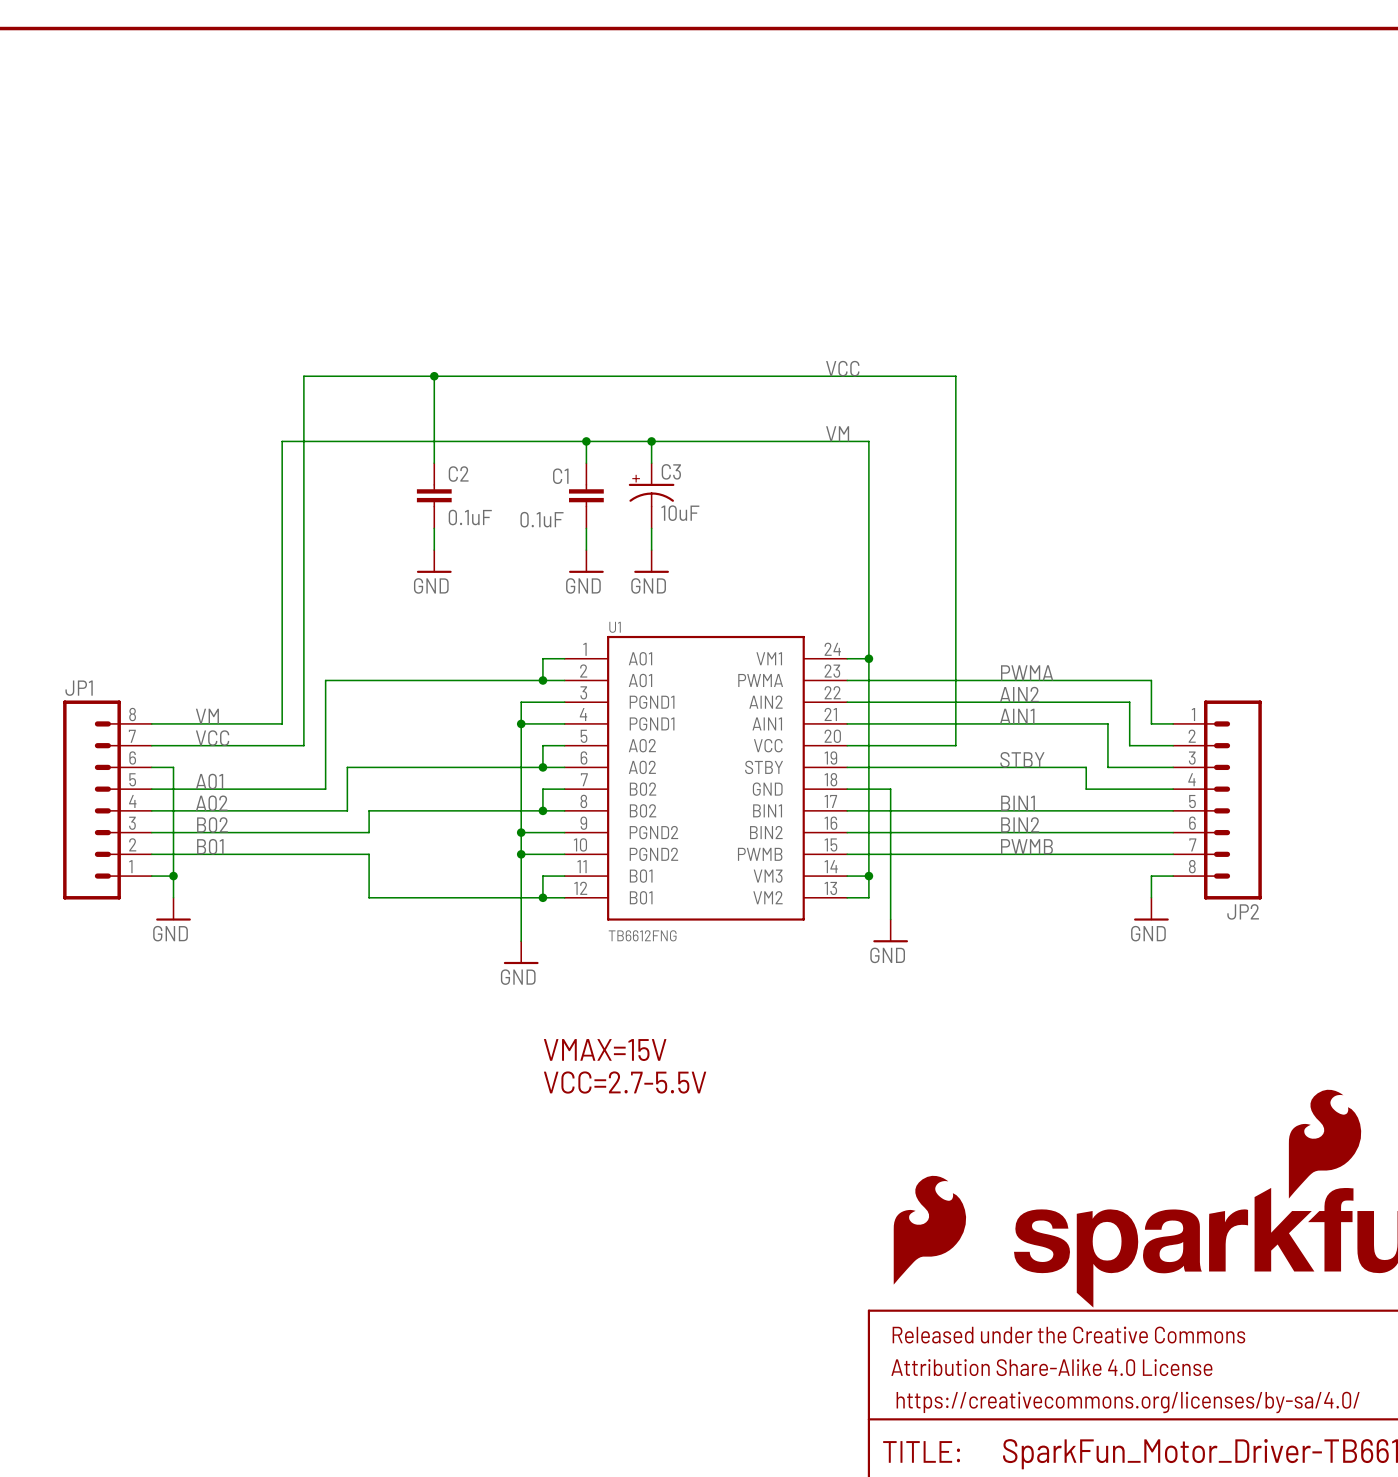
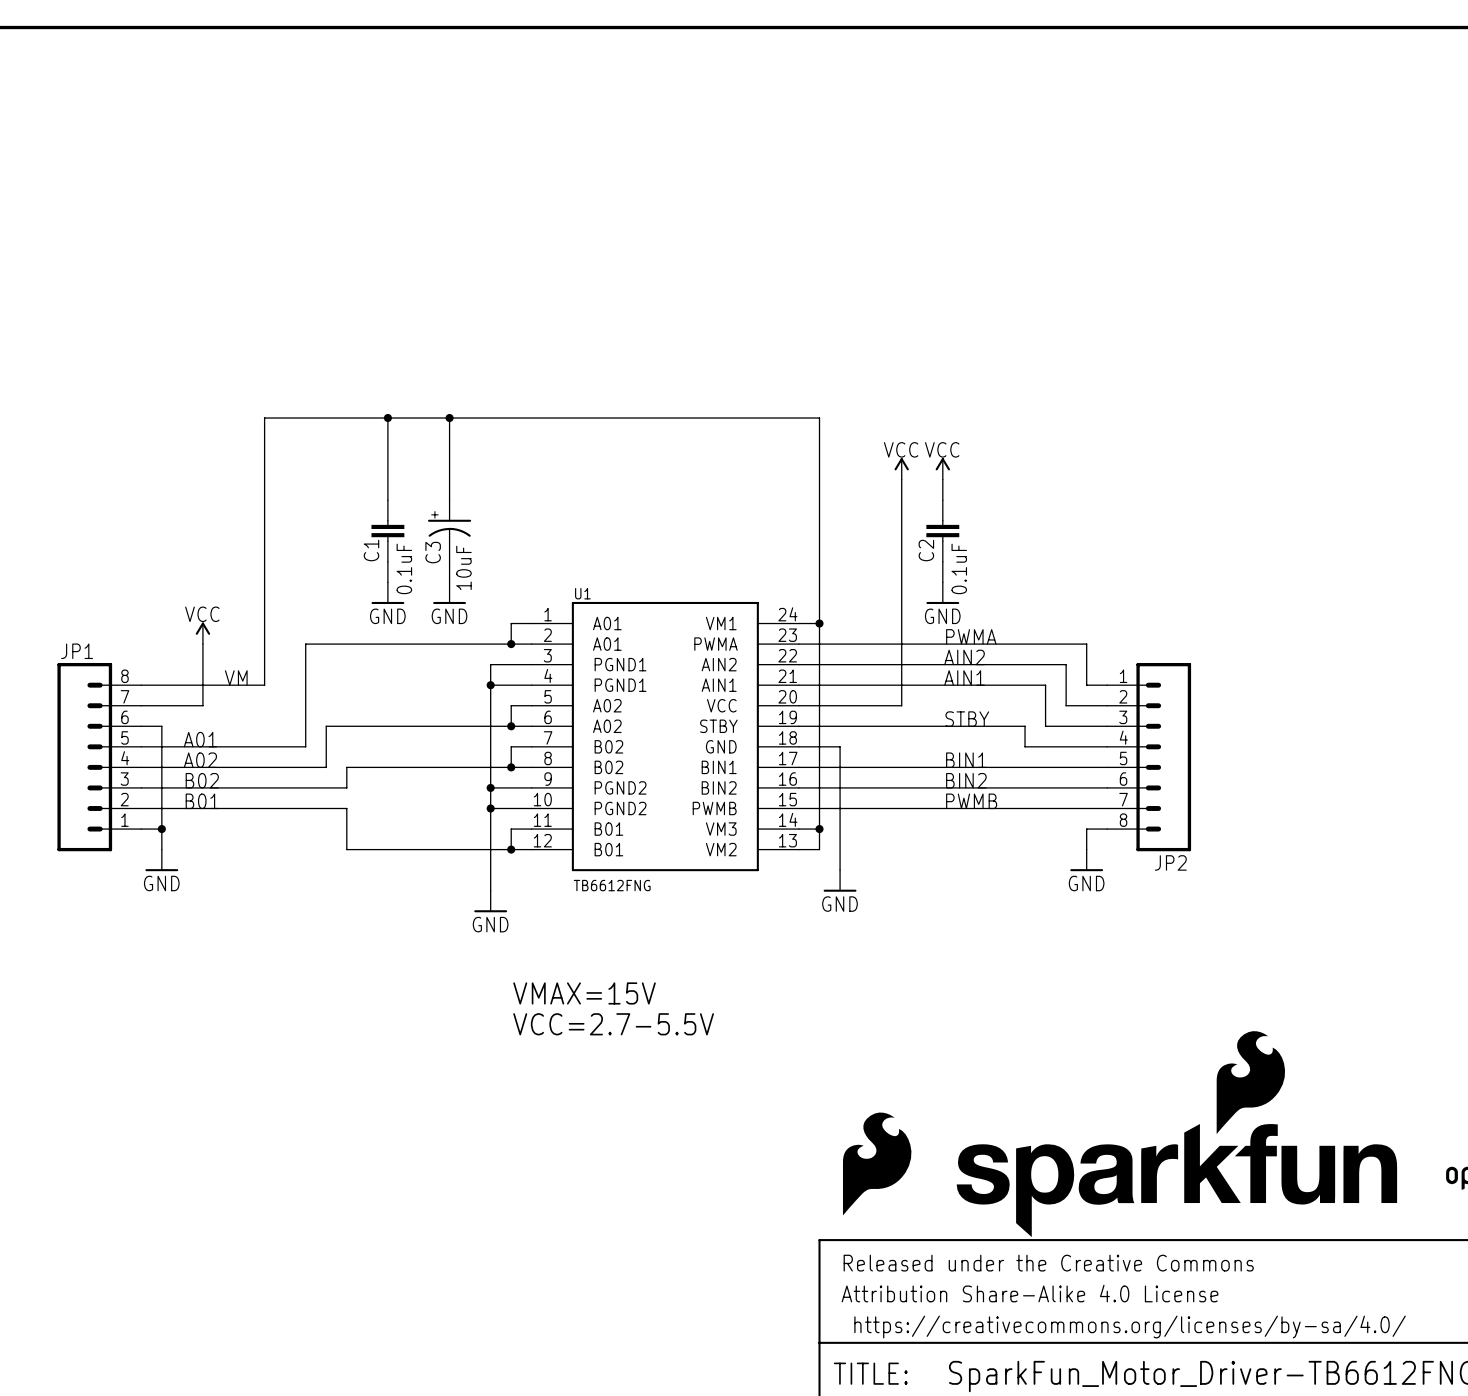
label: VCC (842, 368) -> none
wire: (434, 376) (434, 463) -> (387, 418) (387, 500)
junction: (434, 376) -> none
label: VM (837, 433) -> none
junction: none -> (387, 418)
wire: none -> (449, 418) (449, 500)
junction: none -> (449, 418)
wire: (586, 441) (586, 463) -> none
junction: (586, 441) -> none
wire: (651, 441) (651, 463) -> none
junction: (651, 441) -> none
C3 name rotation: 0° (671, 471) -> 90° counterclockwise (433, 552)
C3 name position: C3 (671, 471) -> C3 (433, 552)
C2 name rotation: 0° (458, 474) -> 90° counterclockwise (926, 550)
C2 name position: C2 (458, 474) -> C2 (926, 550)
C1 name rotation: 0° (560, 476) -> 90° counterclockwise (371, 550)
C1 name position: C1 (560, 476) -> C1 (371, 550)
C2 position: (434, 495) -> (942, 531)
C1 position: (586, 495) -> (387, 531)
C3 position: (651, 495) -> (449, 531)
power symbol: none -> VCC (901, 468)
power symbol: none -> VCC (942, 468)
wire: (955, 506) (955, 376) (303, 376) (303, 745) (216, 745) -> (202, 644) (202, 705)
wire: none -> (942, 479) (942, 500)
C3 value rotation: 0° (680, 513) -> 90° counterclockwise (463, 567)
C2 value rotation: 0° (470, 517) -> 90° counterclockwise (959, 568)
C1 value rotation: 0° (541, 519) -> 90° counterclockwise (404, 568)
wire: (434, 528) (434, 550) -> (387, 561) (387, 582)
wire: (586, 528) (586, 550) -> none
wire: (651, 528) (651, 550) -> (449, 561) (449, 582)
power symbol: GND (434, 561) -> none
power symbol: GND (586, 561) -> none
power symbol: GND (651, 561) -> none
wire: none -> (942, 561) (942, 582)
power symbol: none -> GND (387, 593)
power symbol: none -> GND (449, 593)
power symbol: none -> GND (942, 593)
power symbol: none -> VCC (202, 633)
label position: VM (207, 716) -> VM (236, 677)
label: VCC (212, 738) -> none

